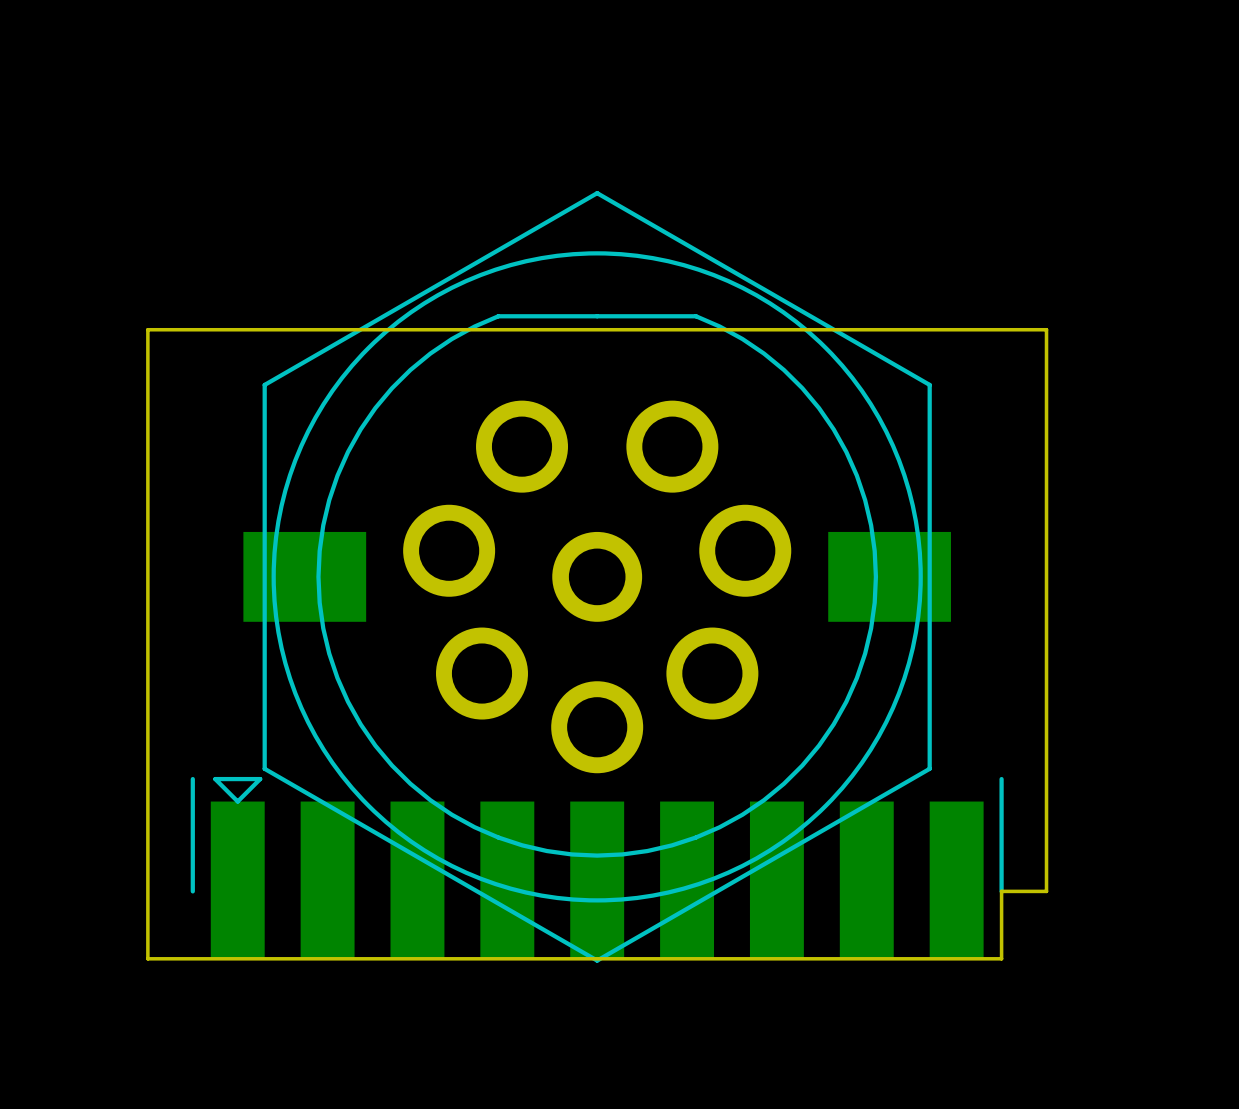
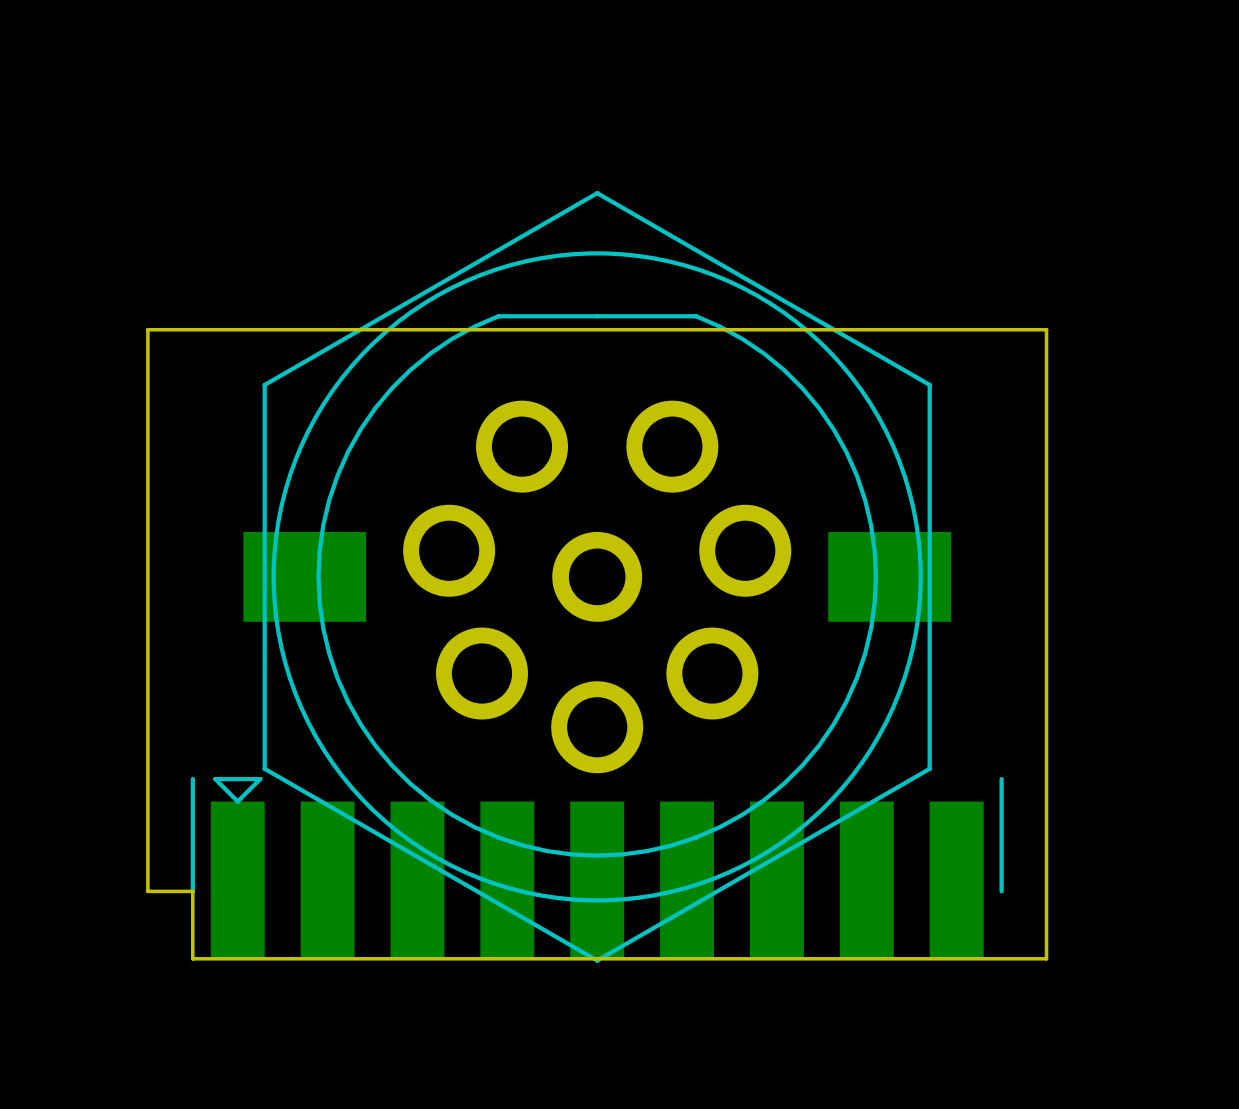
board edge: (147, 891) (147, 958) (192, 958) -> (147, 891) (192, 891) (192, 958)
board edge: (1046, 891) (1001, 891) (1001, 958) -> (1046, 891) (1046, 958) (1001, 958)

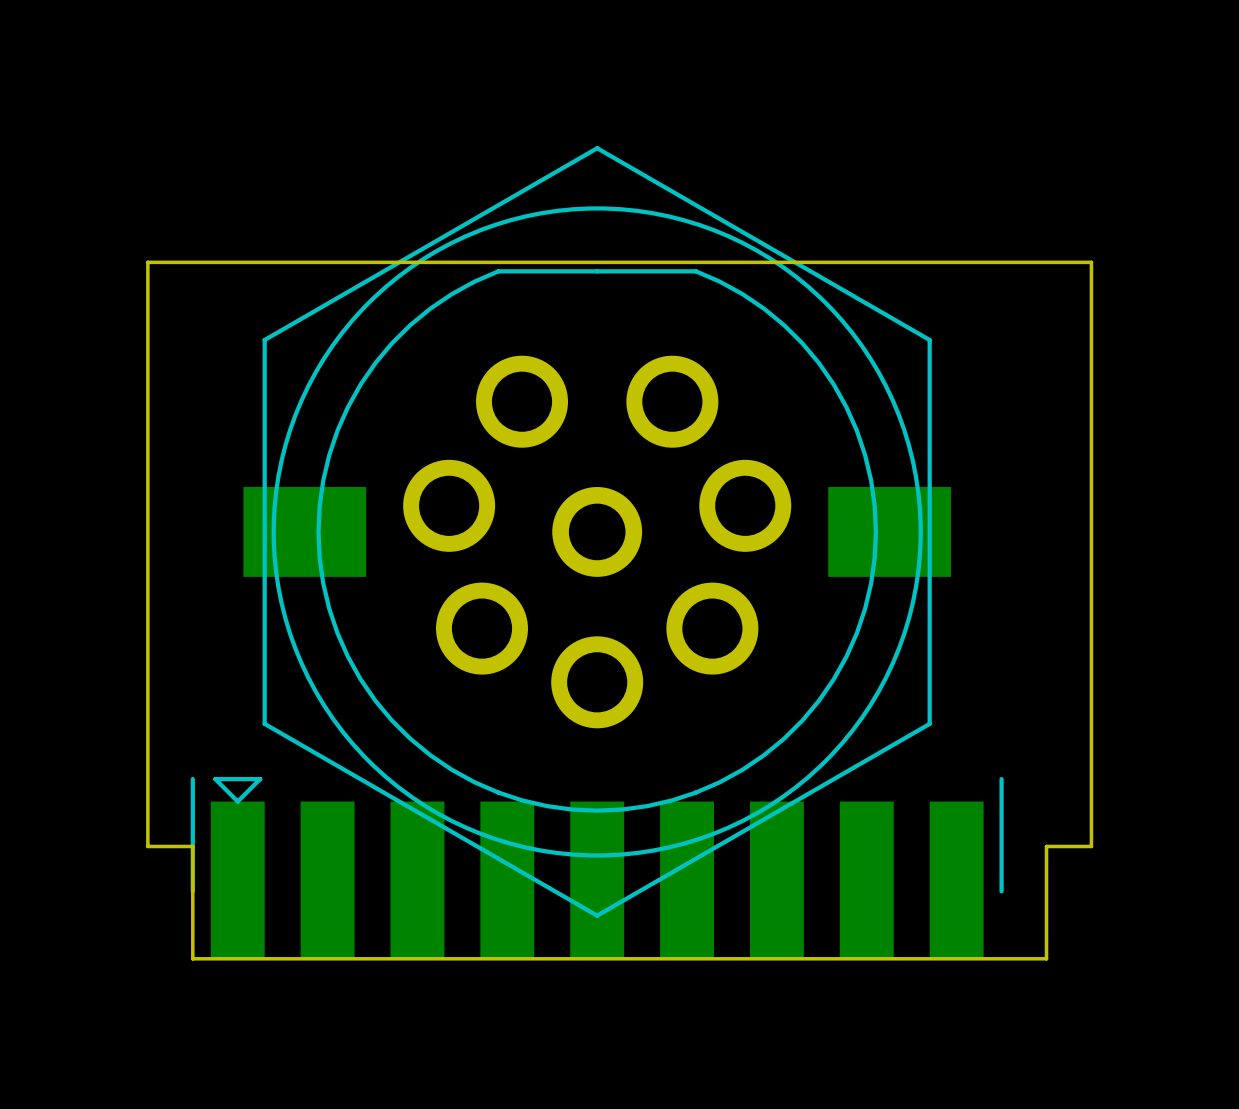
board edge: (147, 329) (1046, 329) (1046, 846) -> (147, 329) (147, 262) (1091, 262) (1091, 846) (1046, 846)
part position: (597, 576) -> (597, 531)
board edge: (147, 846) (147, 891) (192, 891) -> (147, 846) (192, 846) (192, 891)

